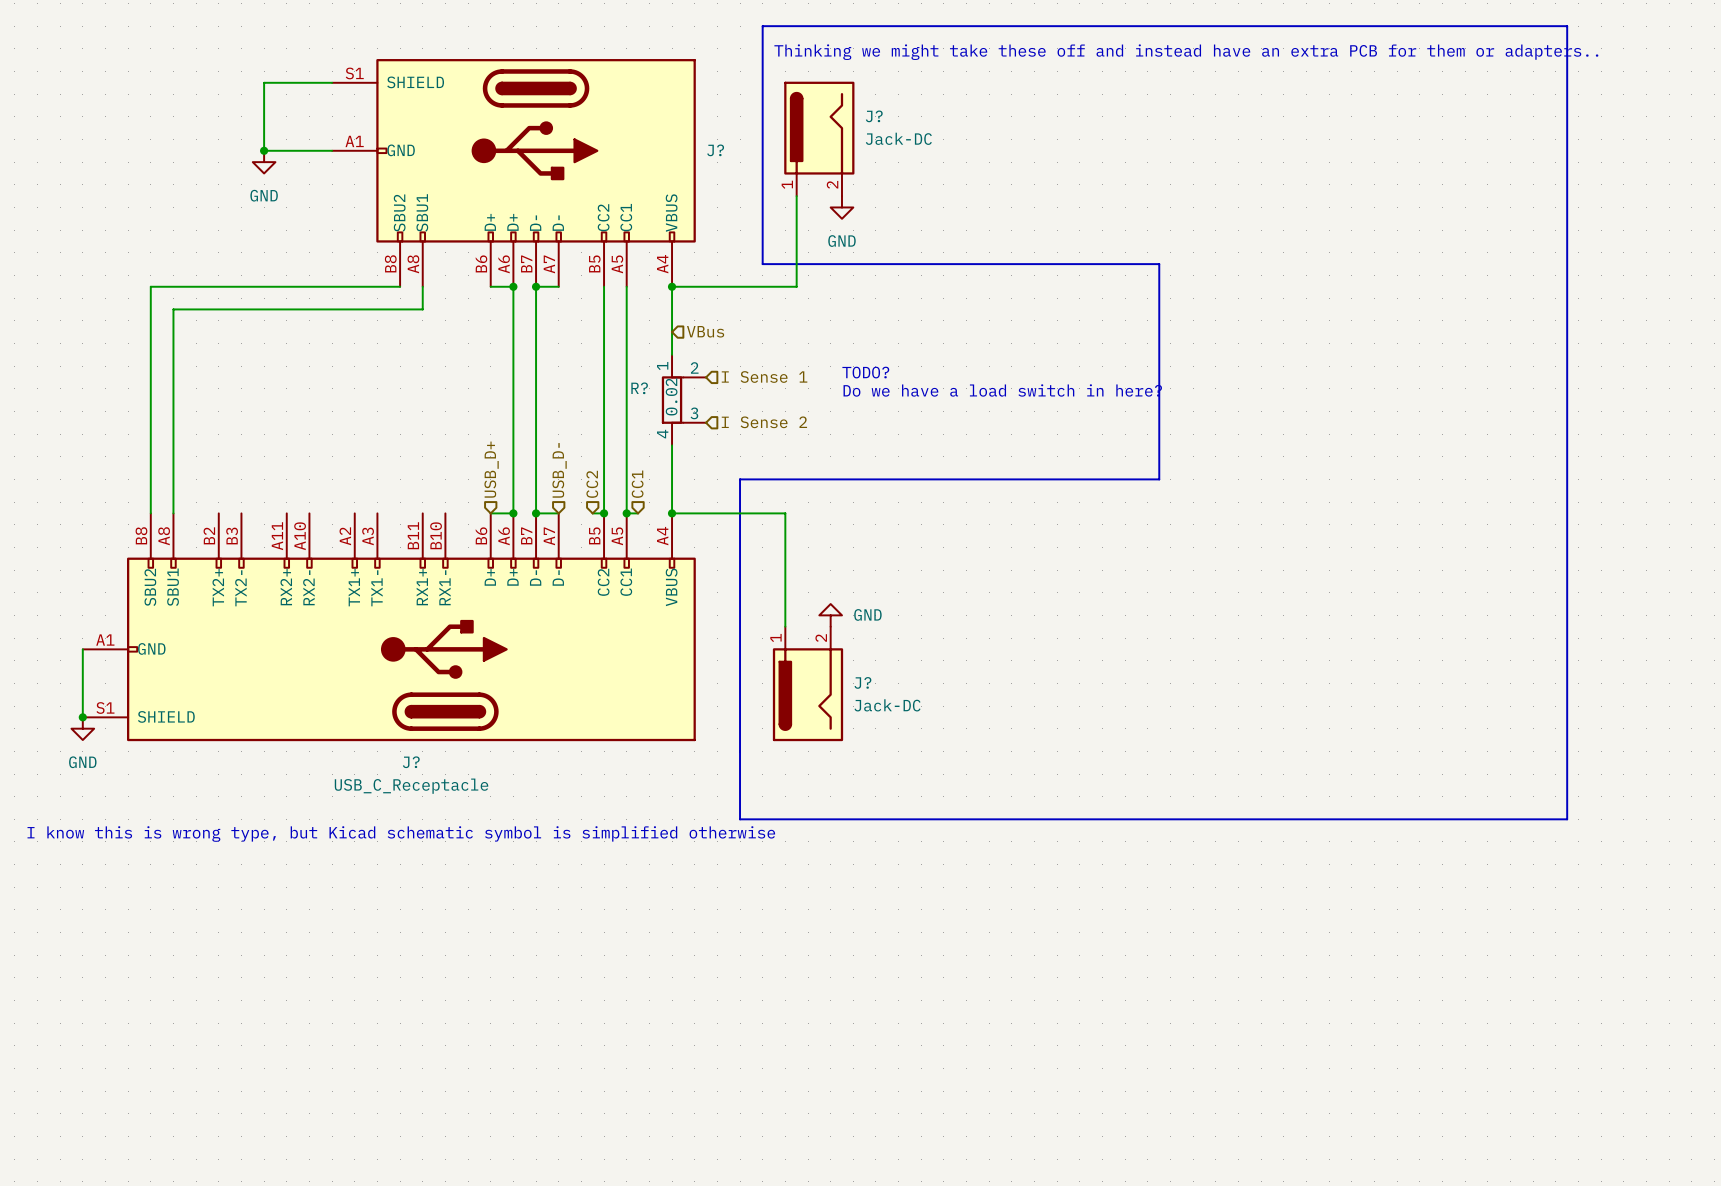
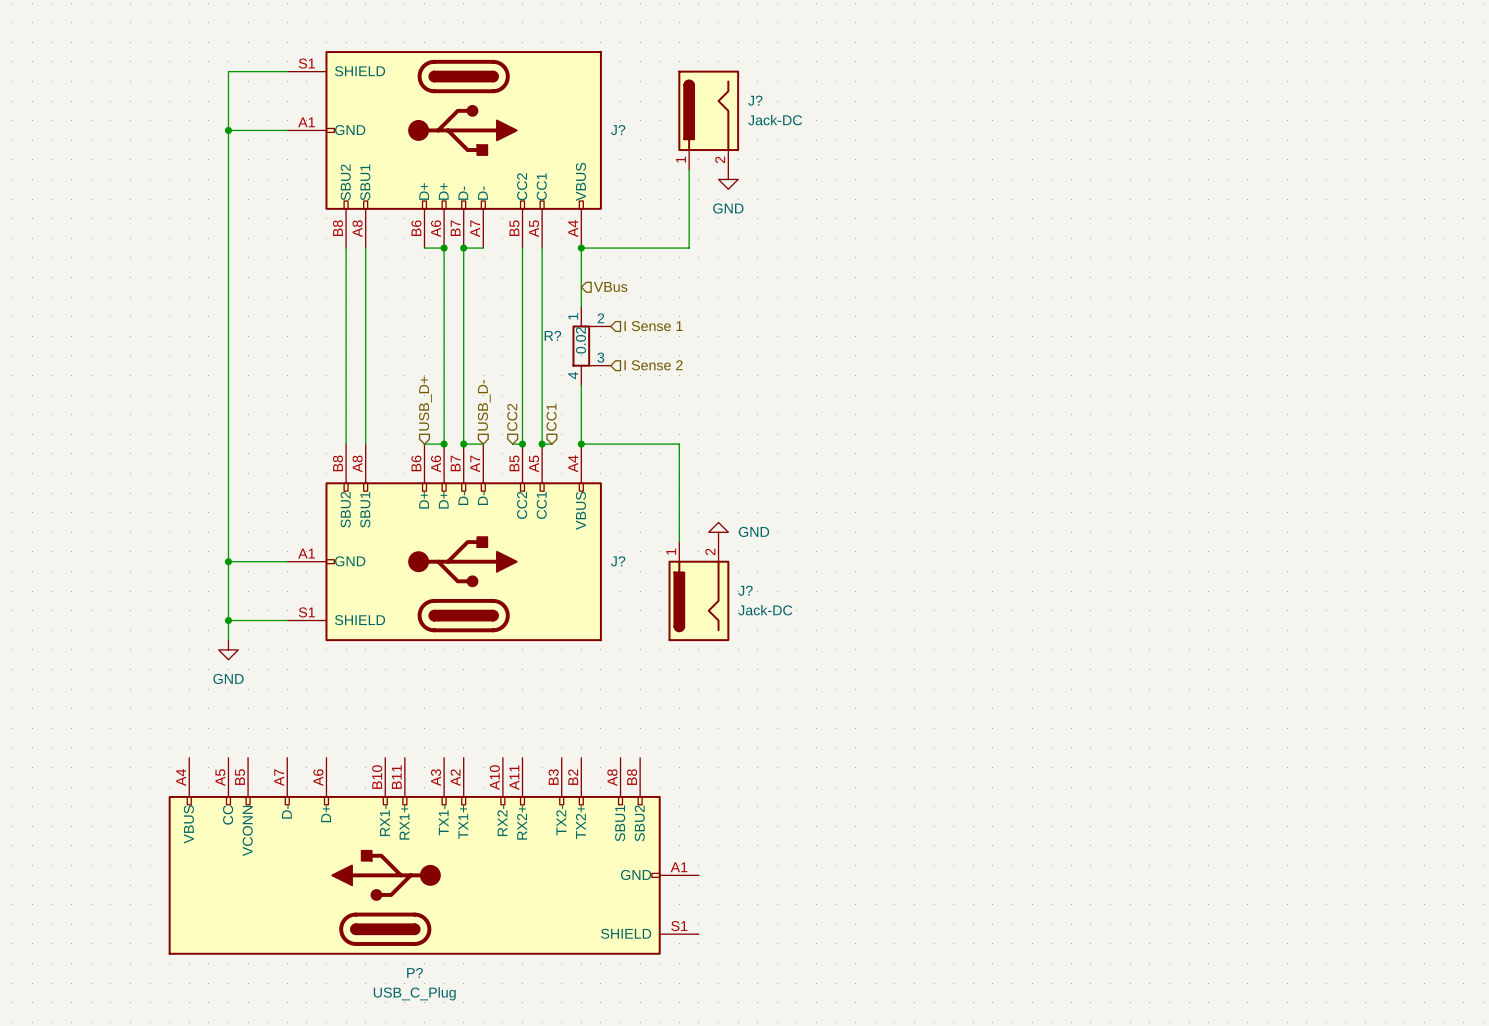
line: (762, 26) (1567, 26) (1567, 819) (740, 819) (740, 479) (1159, 479) (1159, 264) (762, 264) (762, 26) -> none
text: Thinking we might take these off and instead have an extra PCB for them or adapters.. (1186, 52) -> none
wire: none -> (228, 130) (228, 640)
power symbol: GND (264, 162) -> none
wire: (400, 286) (150, 286) (150, 513) -> (346, 248) (346, 444)
wire: (422, 309) (173, 309) (173, 513) -> (365, 267) (365, 444)
text: TODO? (865, 372) -> none
text: Do we have a load switch in here? (1002, 390) -> none
J?: USB_C_Receptacle (389, 627) -> none
J?: none -> (444, 542)
wire: (82, 649) (82, 717) -> none
junction: none -> (228, 561)
junction: (82, 717) -> none
junction: none -> (228, 620)
power symbol position: GND (82, 728) -> GND (228, 649)
text: I know this is wrong type, but Kicad schematic symbol is simplified otherwise (401, 834) -> none
P?: none -> USB_C_Plug (433, 856)

